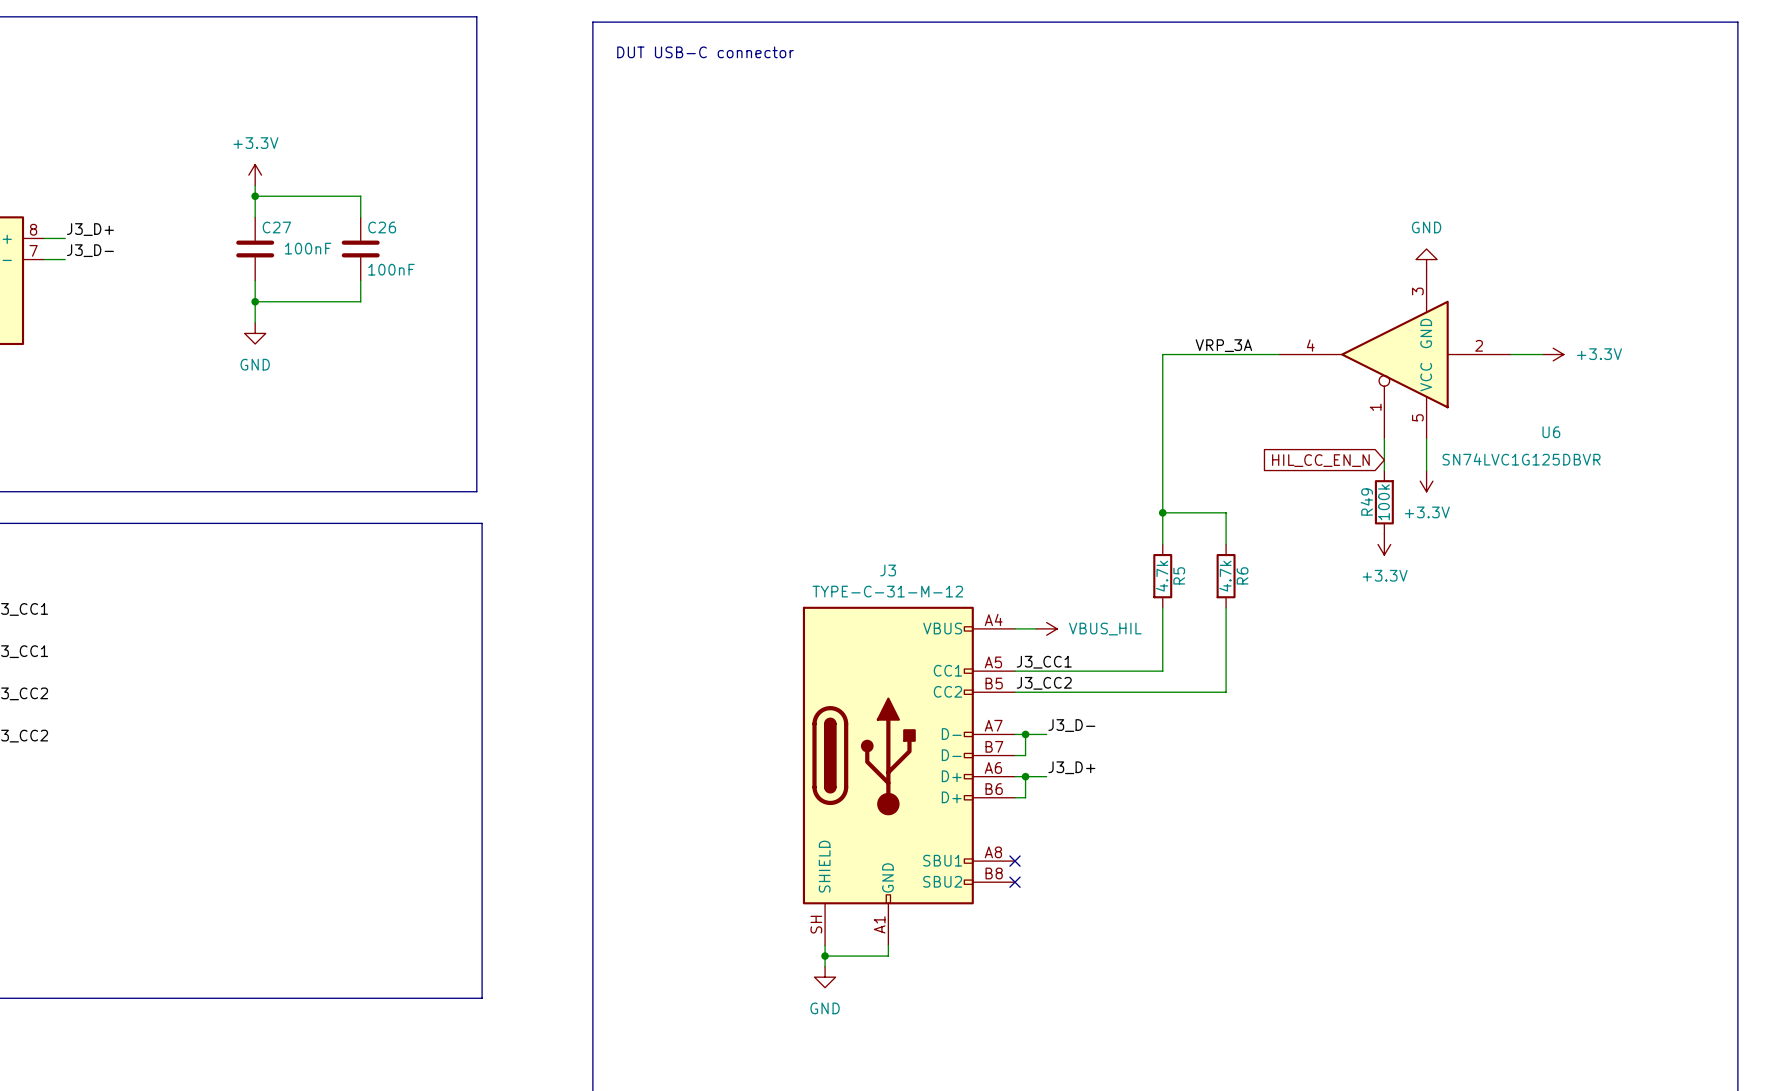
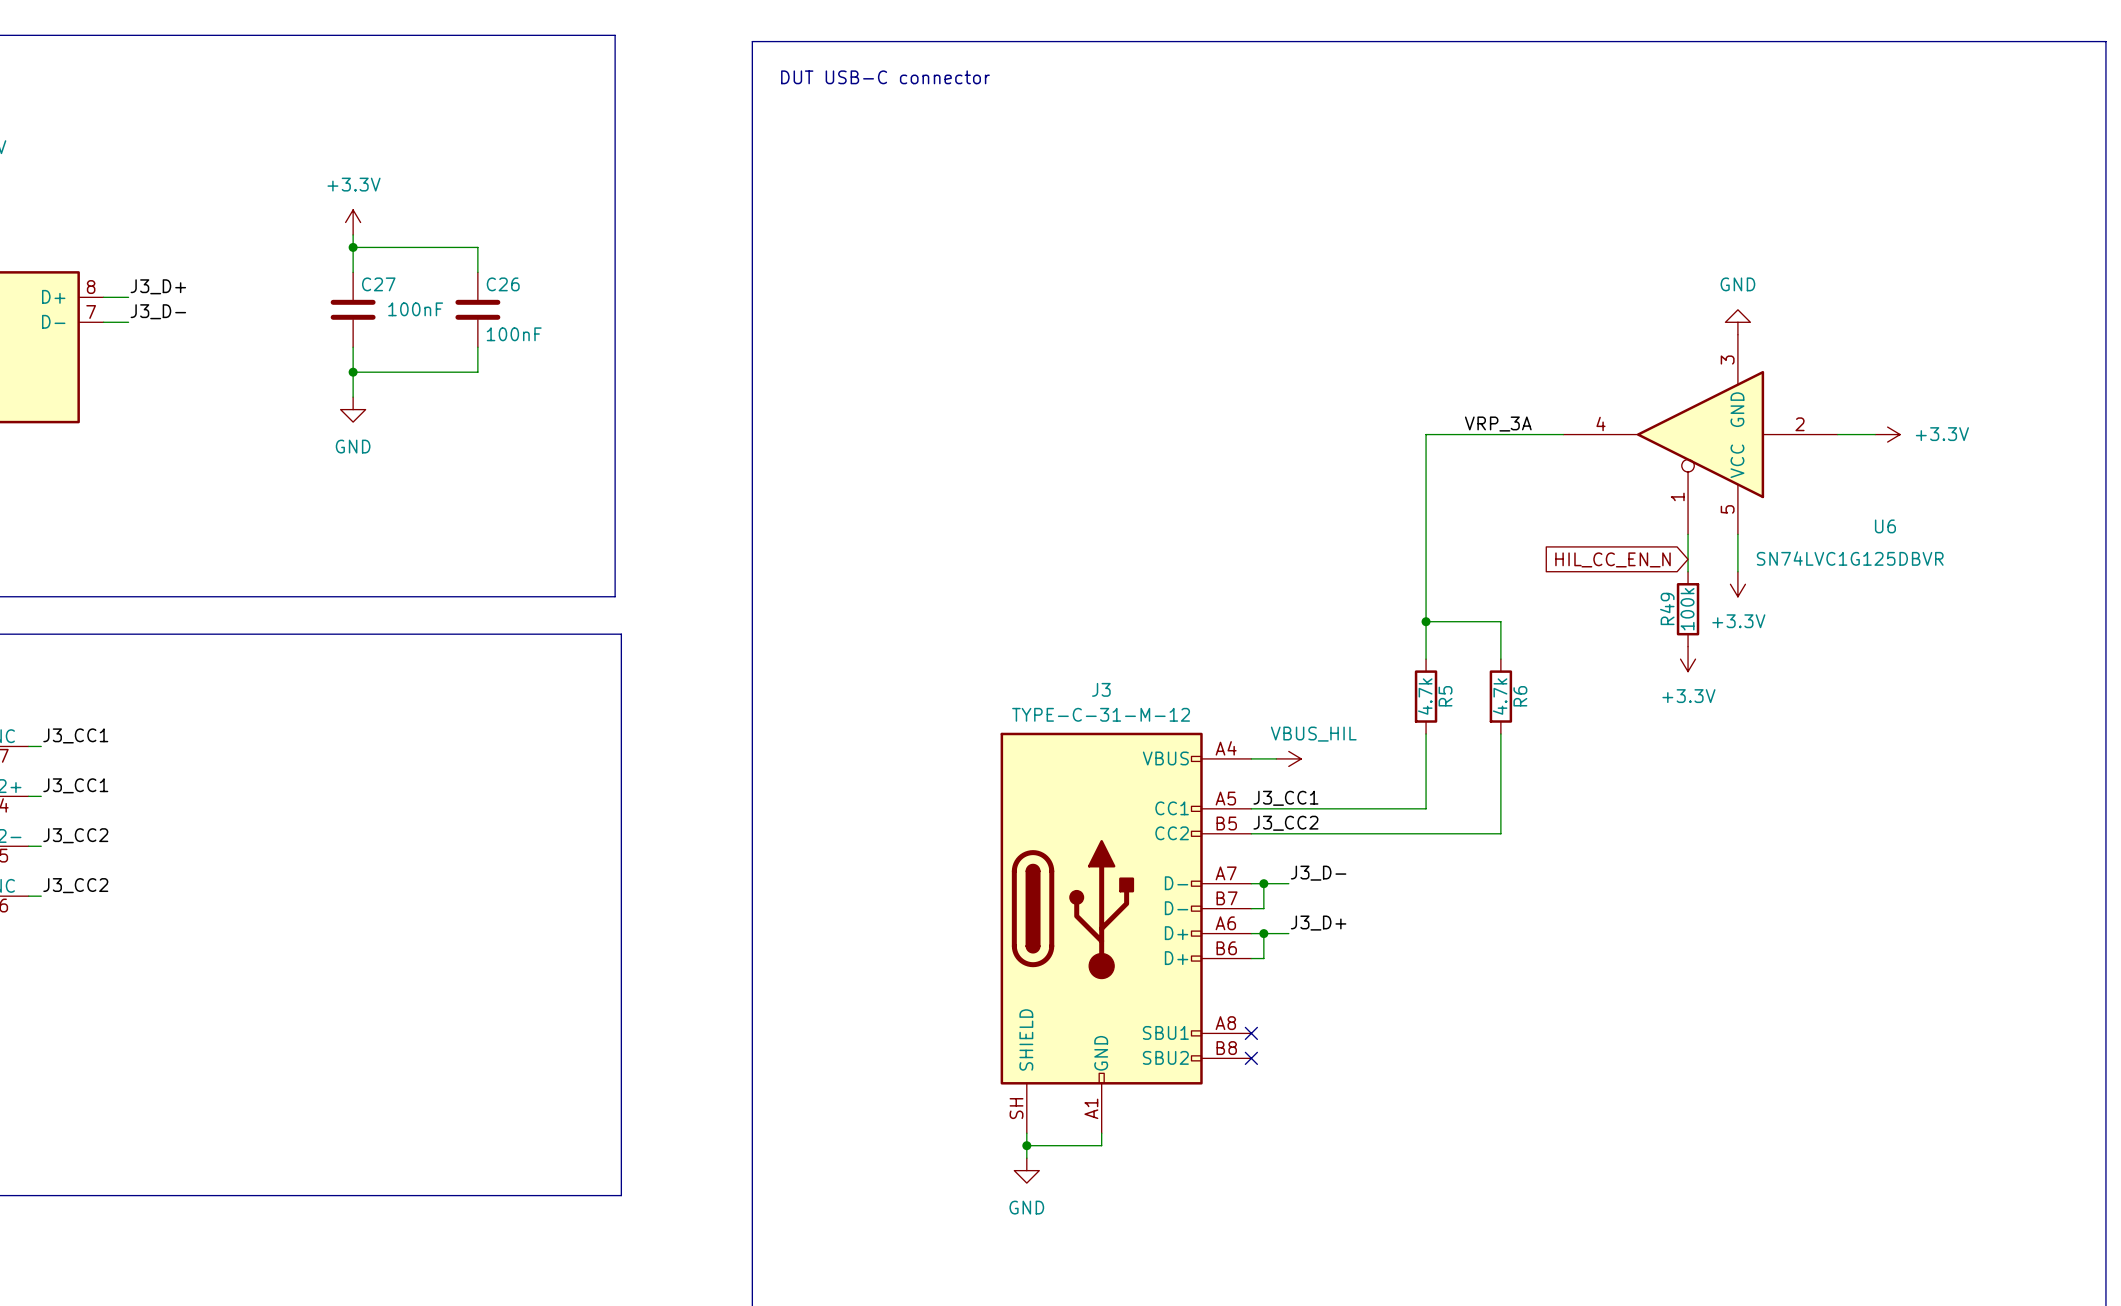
power symbol text position: VBUS_HIL (1105, 629) -> VBUS_HIL (1313, 734)

